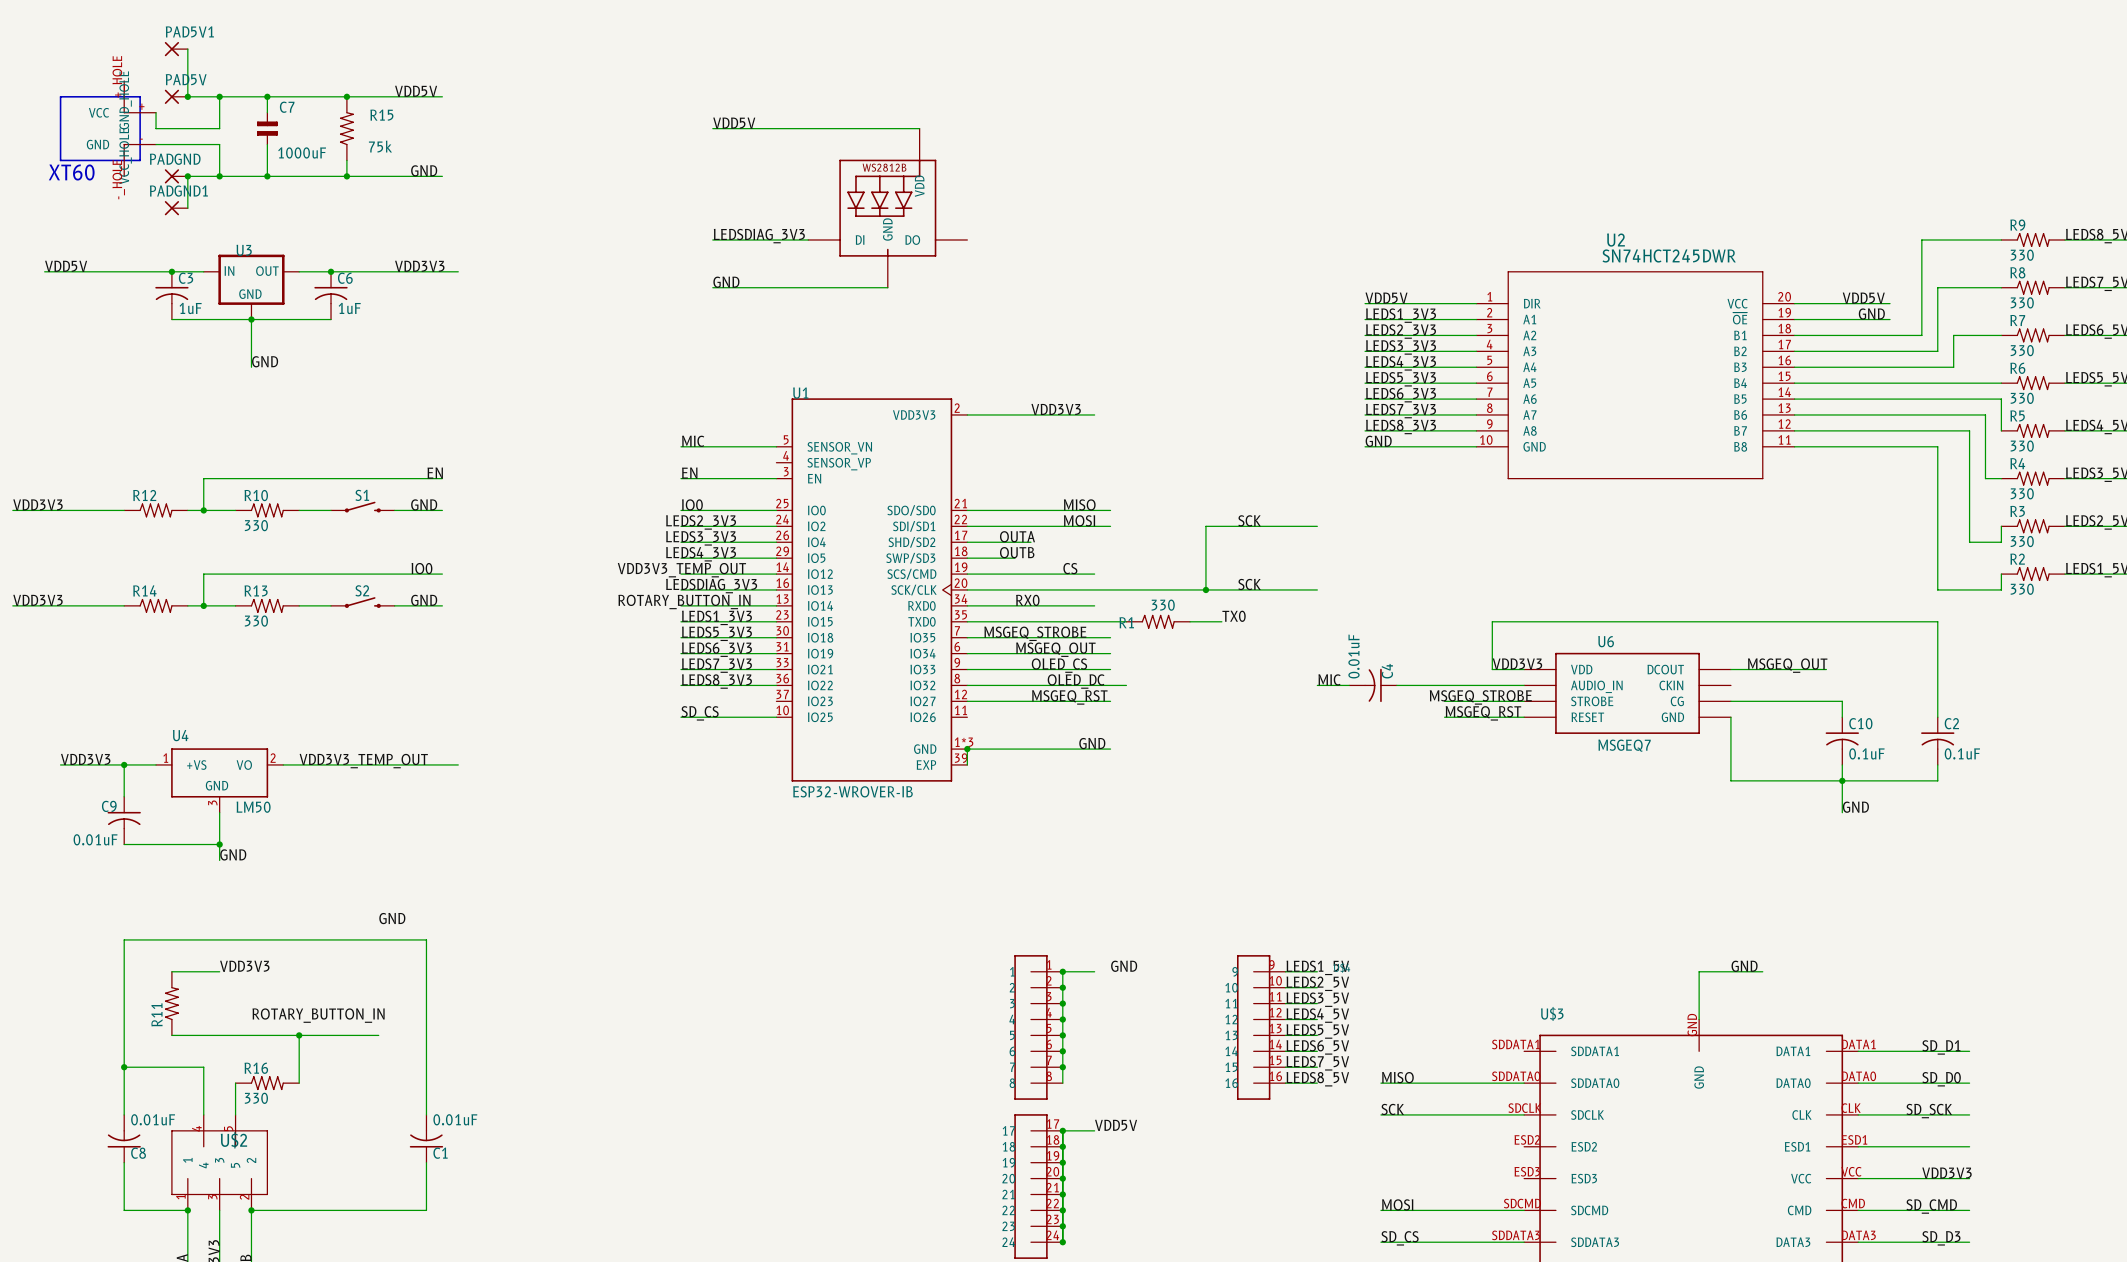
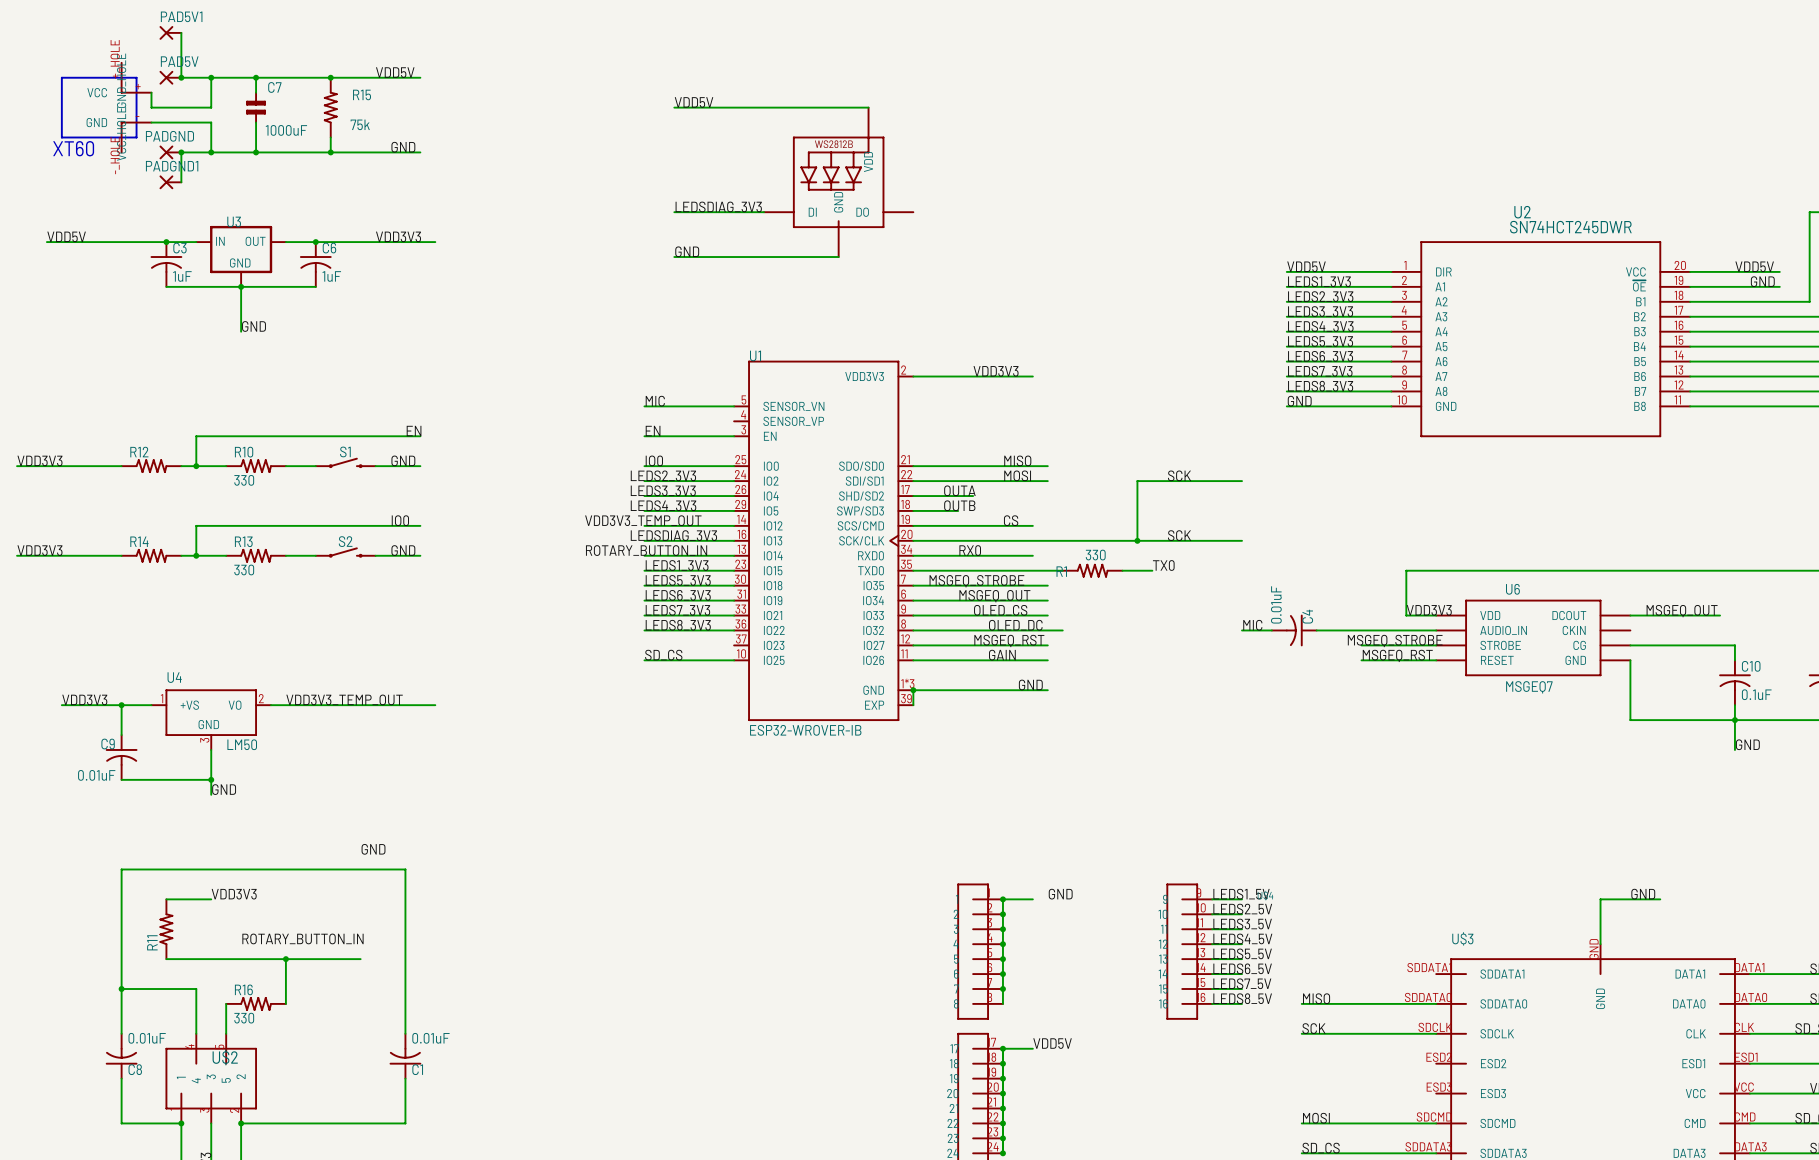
label: none -> GAIN (1002, 655)
wire: none -> (913, 660) (1047, 660)

